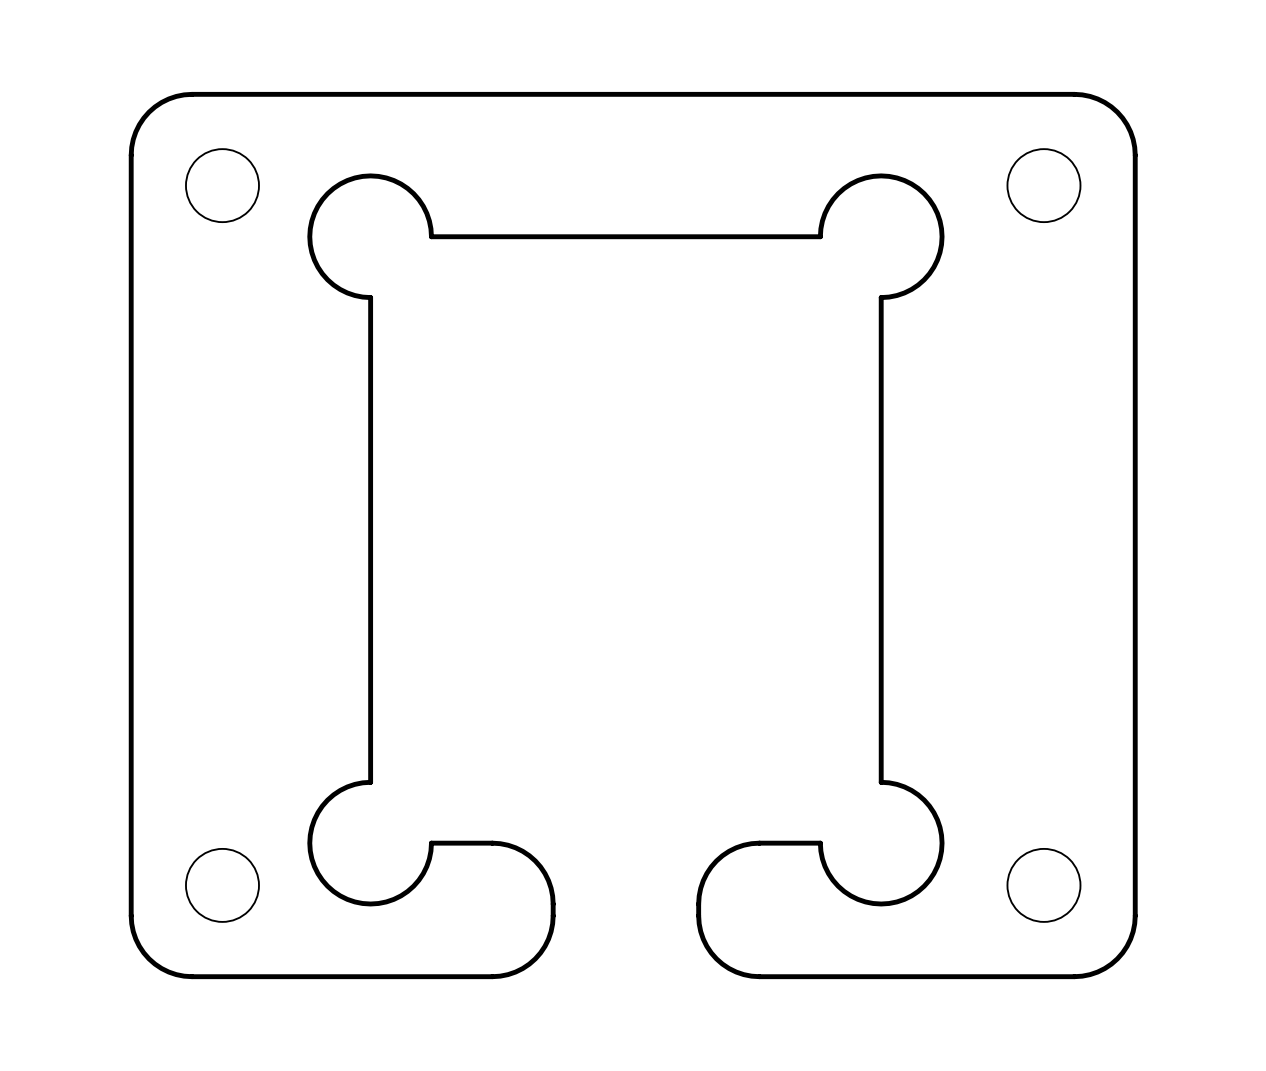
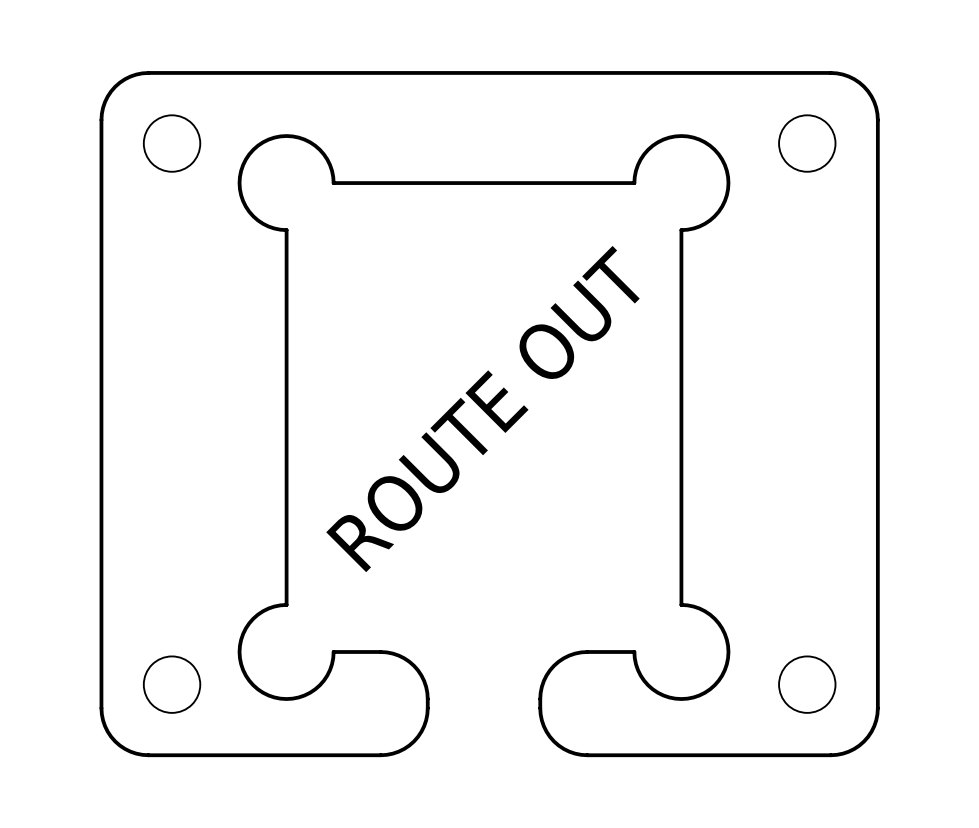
text: none -> ROUTE OUT (483, 409)

